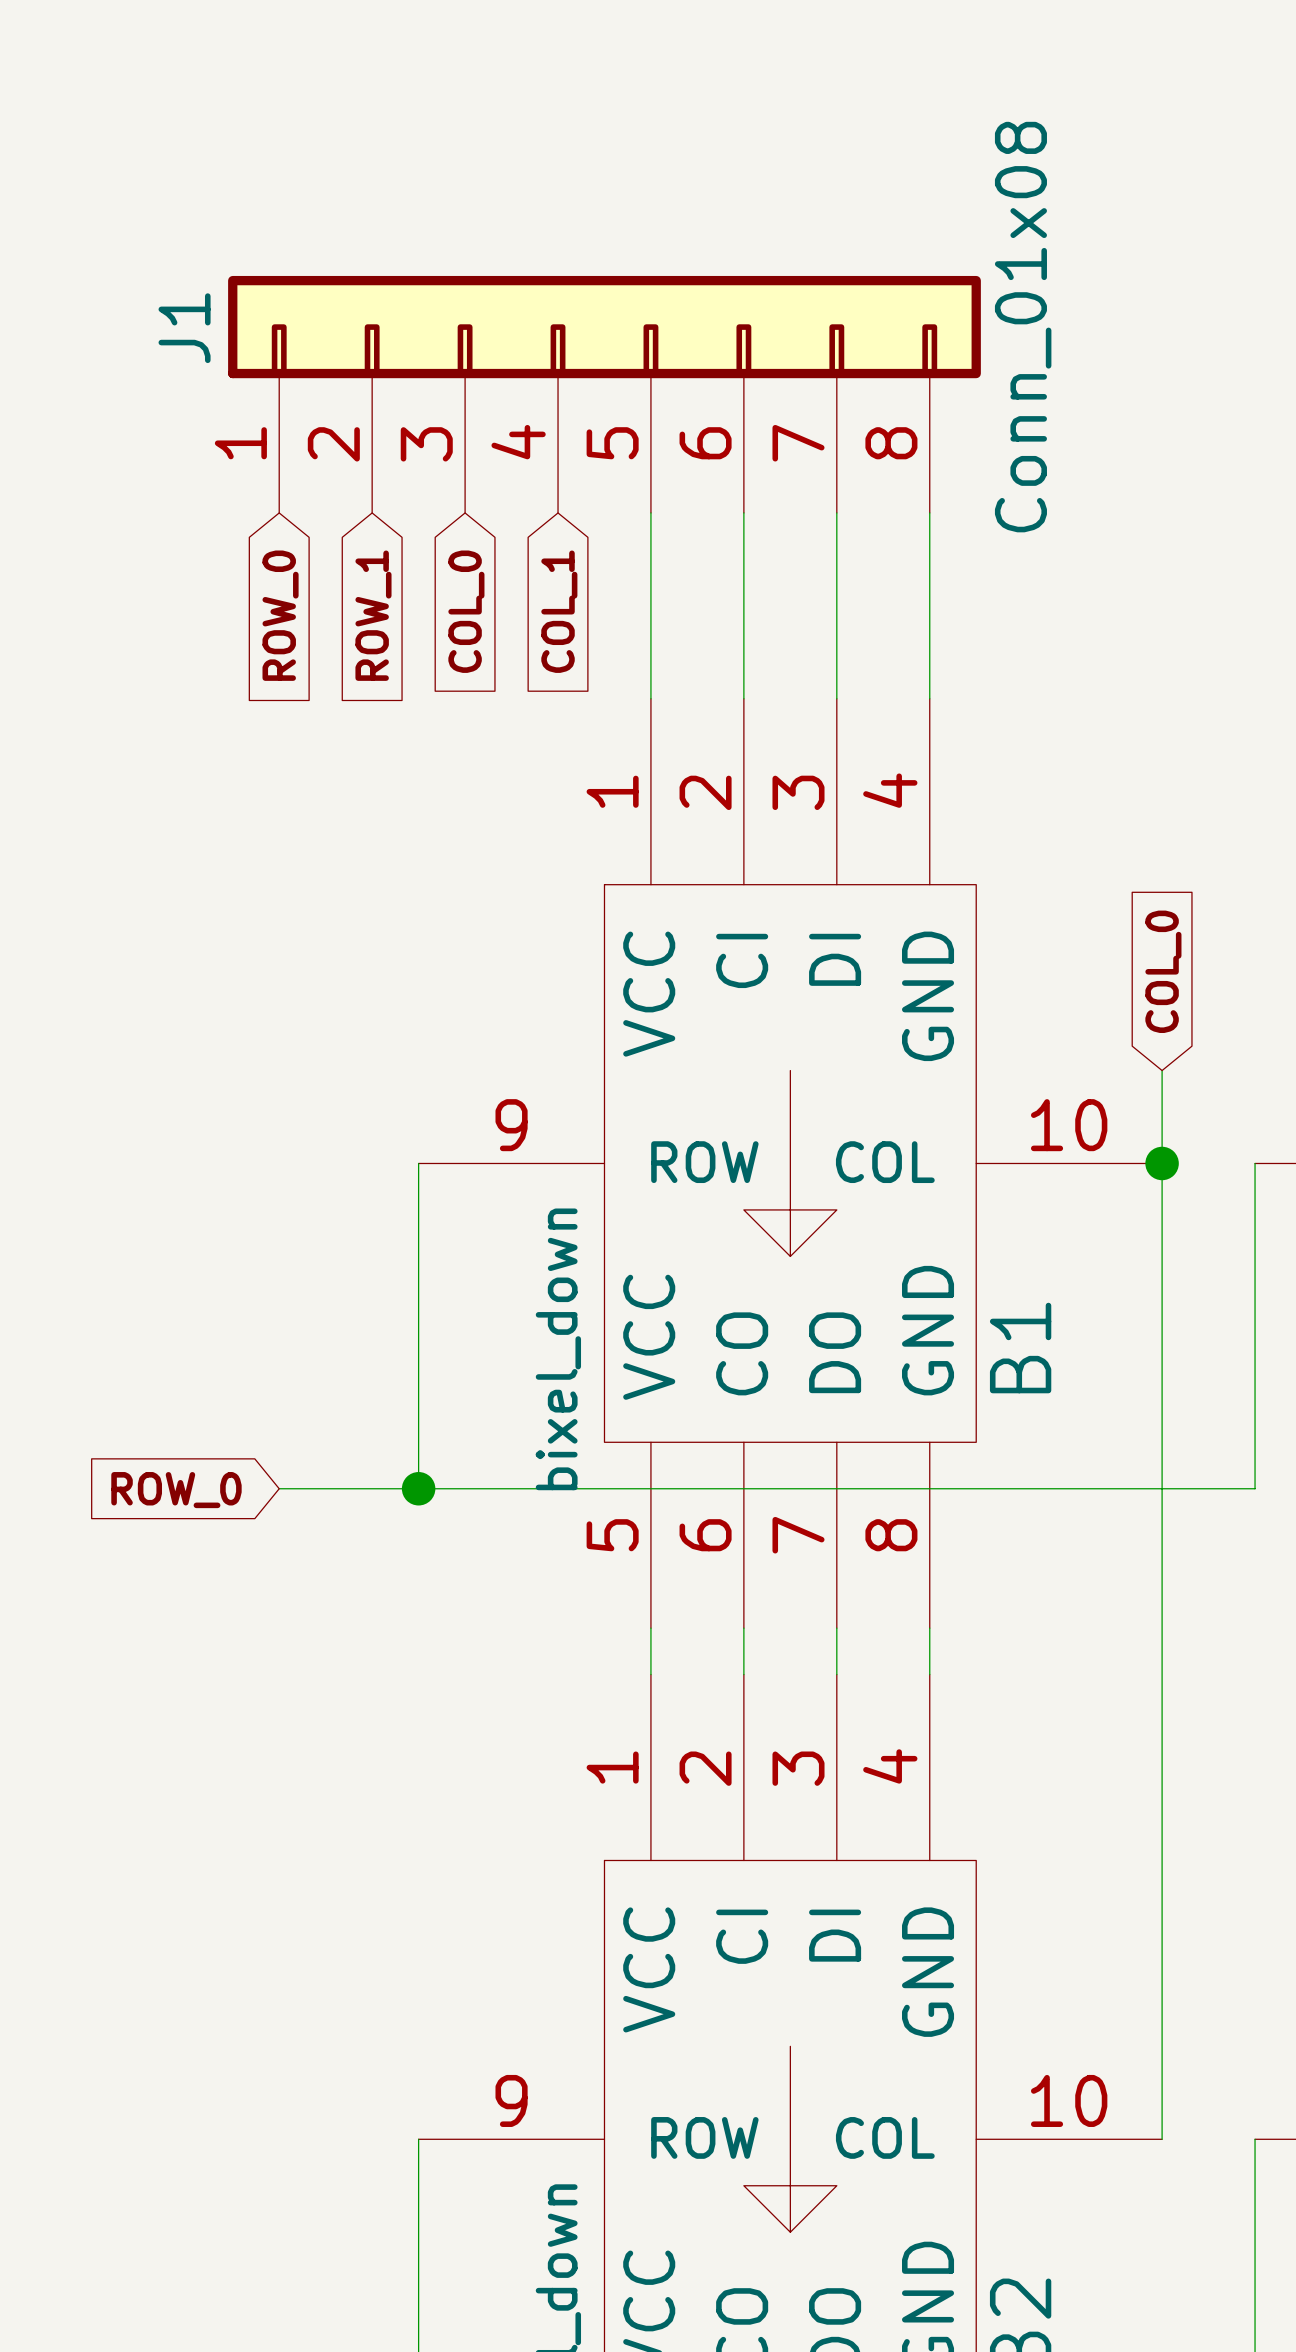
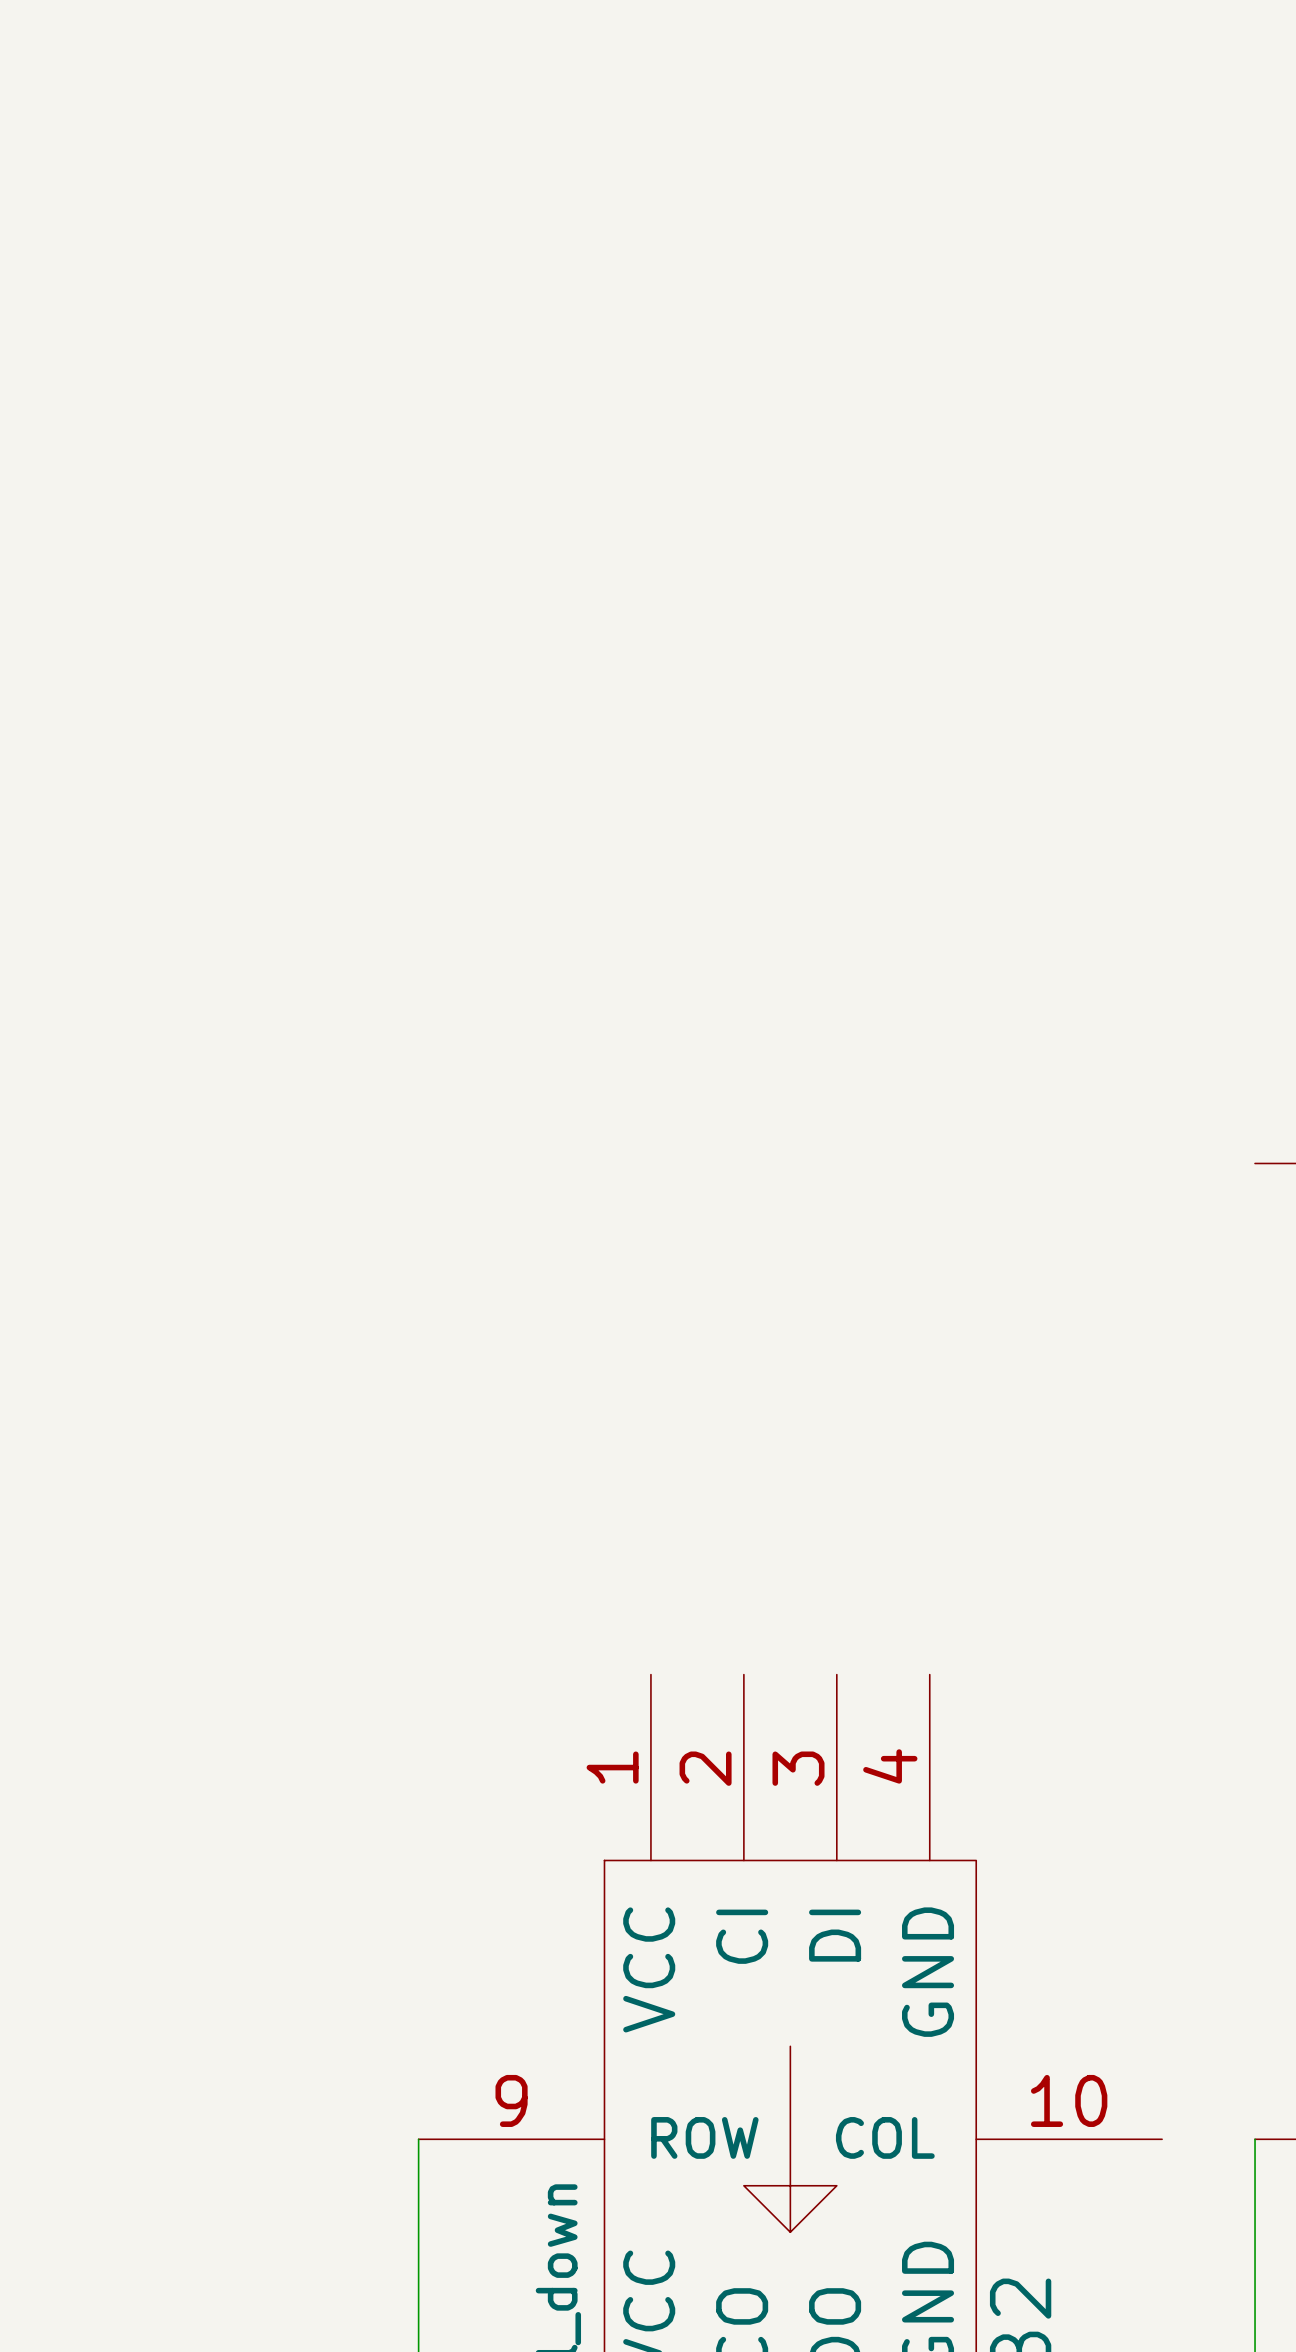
J1: Conn_01x08 (604, 394) -> none
wire: (650, 512) (650, 698) -> none
wire: (743, 512) (743, 698) -> none
wire: (836, 512) (836, 698) -> none
wire: (929, 512) (929, 698) -> none
global label: COL_0 (466, 611) -> none
global label: COL_1 (559, 611) -> none
global label: ROW_0 (280, 615) -> none
global label: ROW_1 (373, 615) -> none
global label: COL_0 (1163, 971) -> none
wire: (1162, 1070) (1162, 2139) -> none
wire: (418, 1163) (418, 1488) -> none
B1: bixel_down (790, 1163) -> none
junction: (1162, 1163) -> none
wire: (1255, 1163) (1255, 1488) (279, 1488) -> none
junction: (418, 1488) -> none
global label: ROW_0 (176, 1490) -> none
wire: (650, 1628) (650, 1674) -> none
wire: (743, 1628) (743, 1674) -> none
wire: (836, 1628) (836, 1674) -> none
wire: (929, 1628) (929, 1674) -> none

